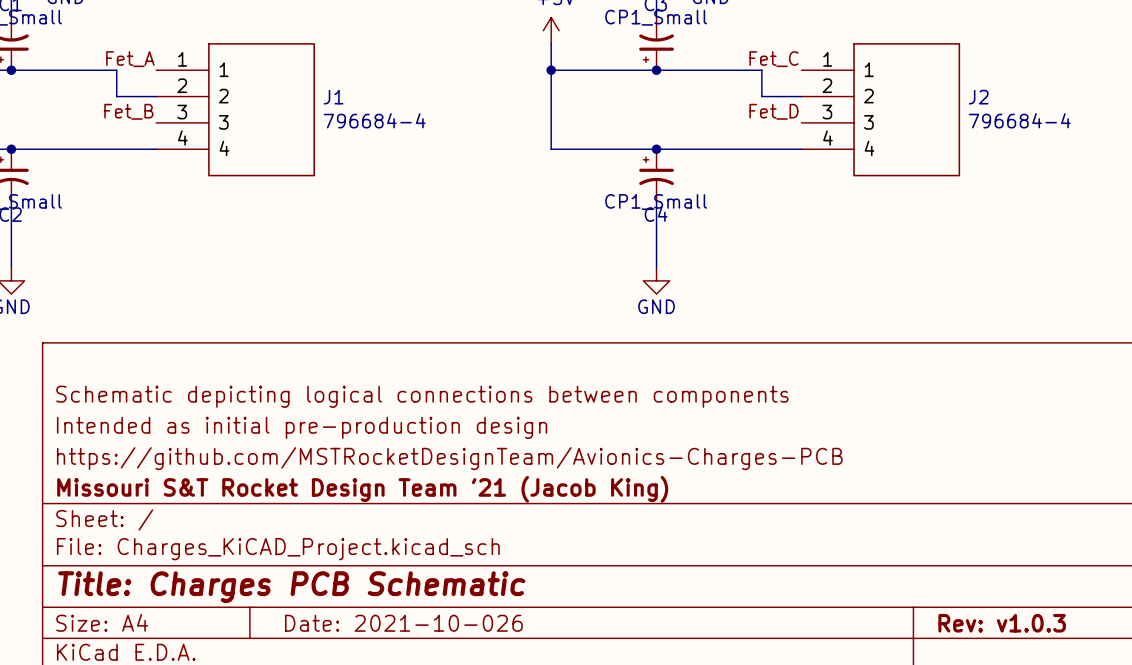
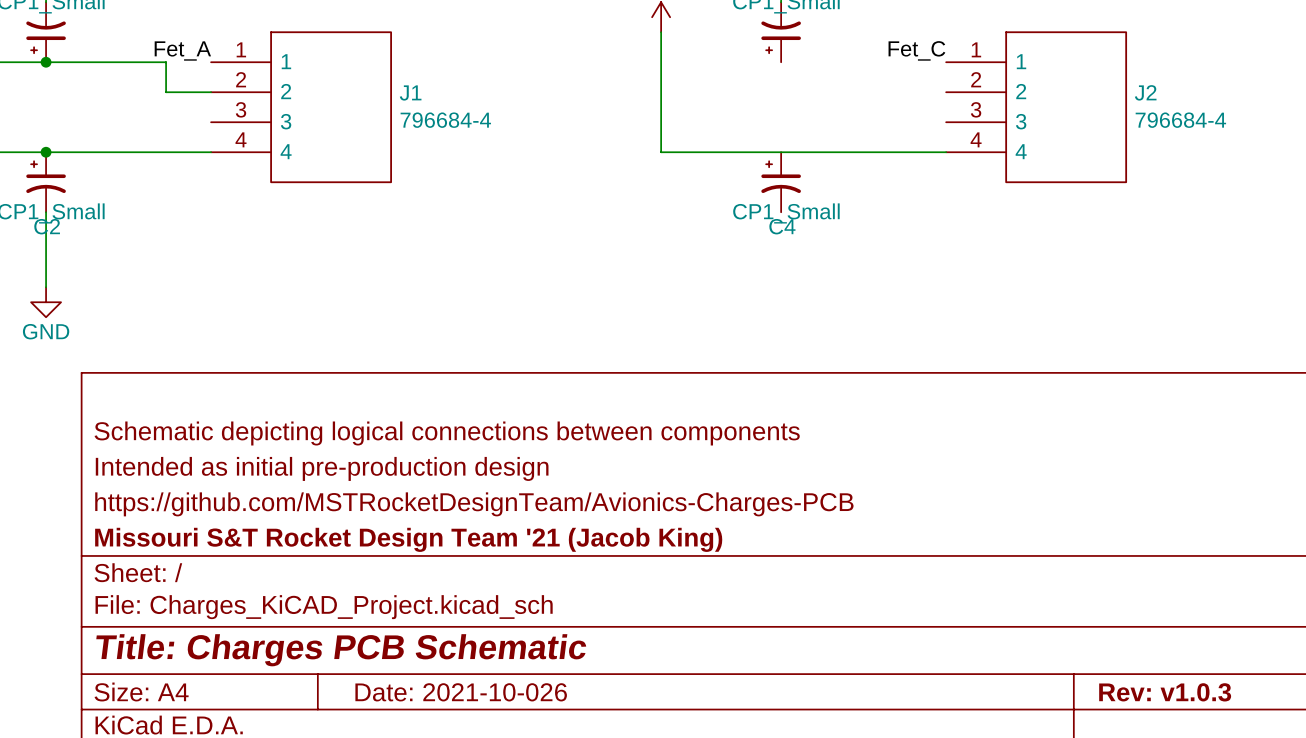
wire: (551, 70) (761, 70) (761, 96) (801, 96) -> none
junction: (551, 70) -> none
junction: (656, 70) -> none
label: Fet_B (128, 111) -> none
label: Fet_D (773, 111) -> none
junction: (656, 149) -> none
wire: (656, 201) (656, 267) -> none
power symbol: GND (656, 280) -> none

